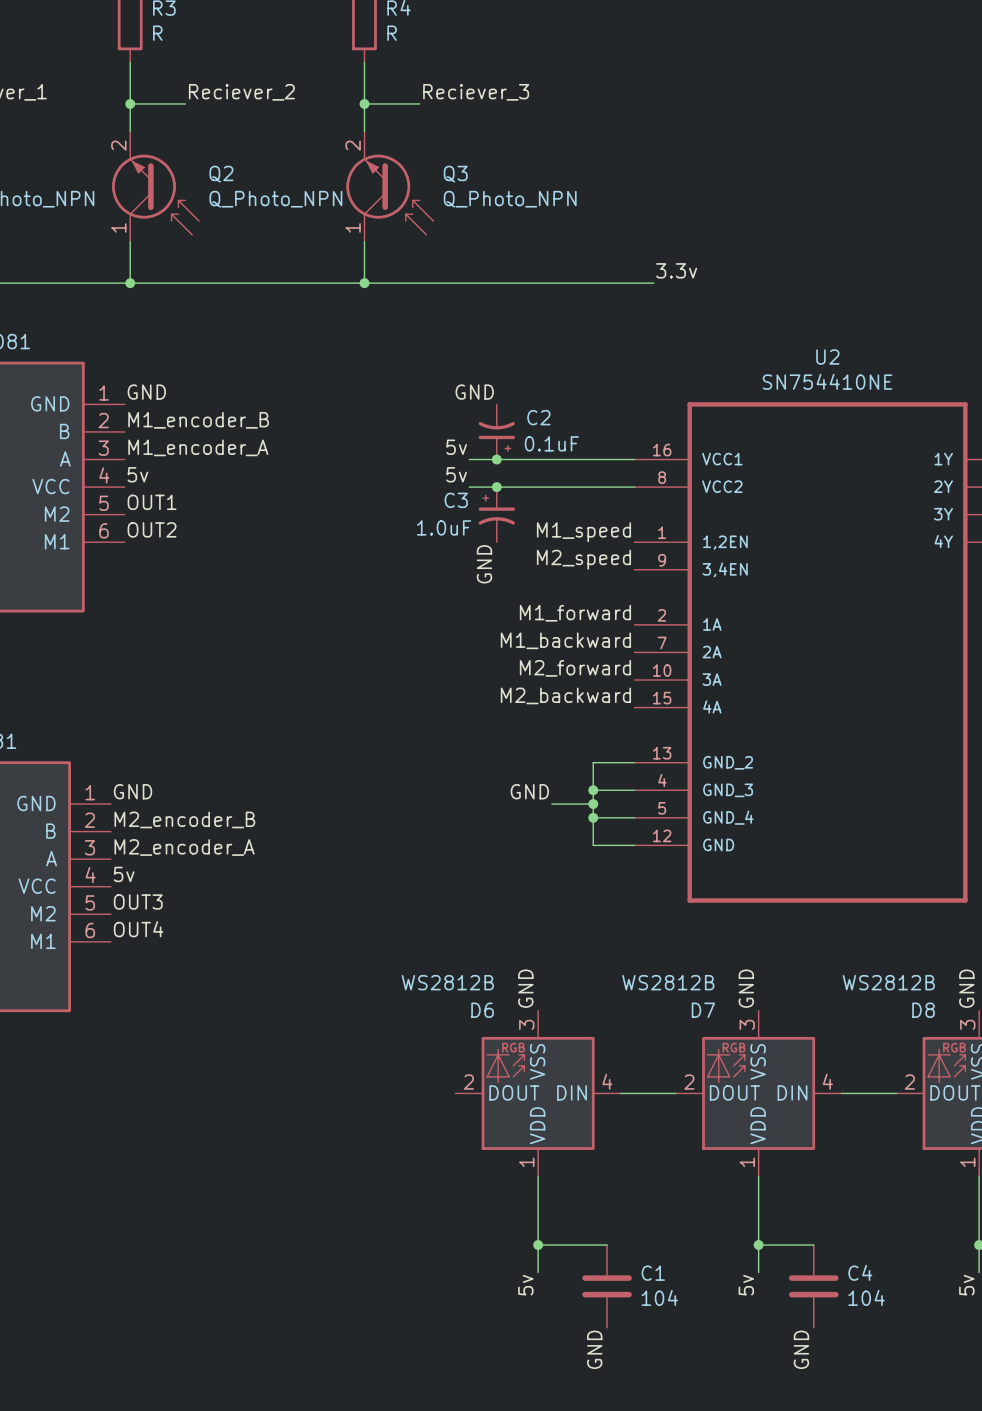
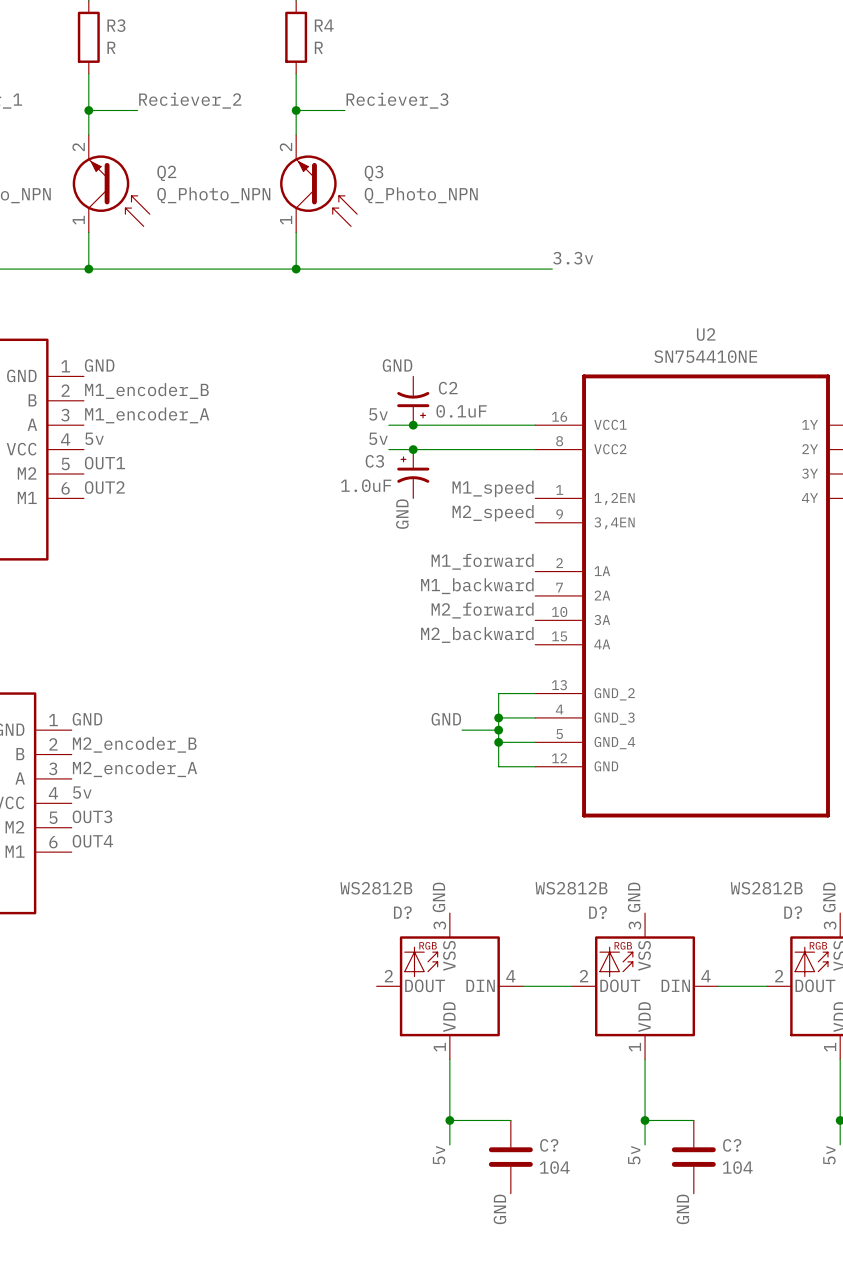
D6 name: D6 (482, 1010) -> D? (402, 912)
D7 name: D7 (703, 1010) -> D? (597, 912)
D8 name: D8 (923, 1010) -> D? (793, 912)
C4 name: C4 (860, 1272) -> C? (732, 1145)
C1 name: C1 (653, 1273) -> C? (549, 1145)

